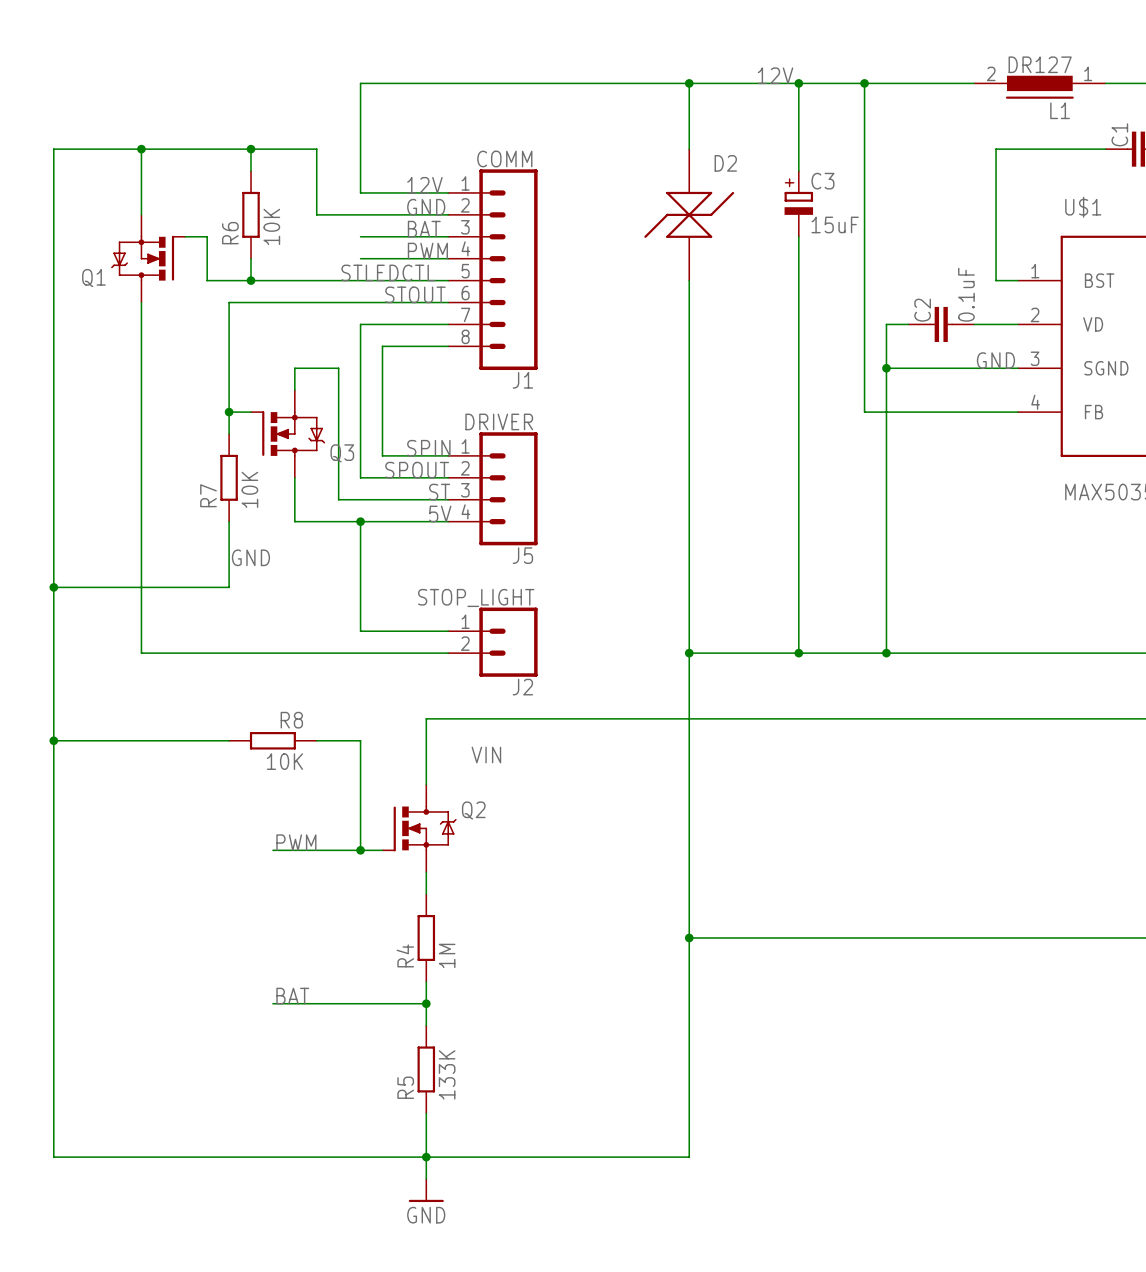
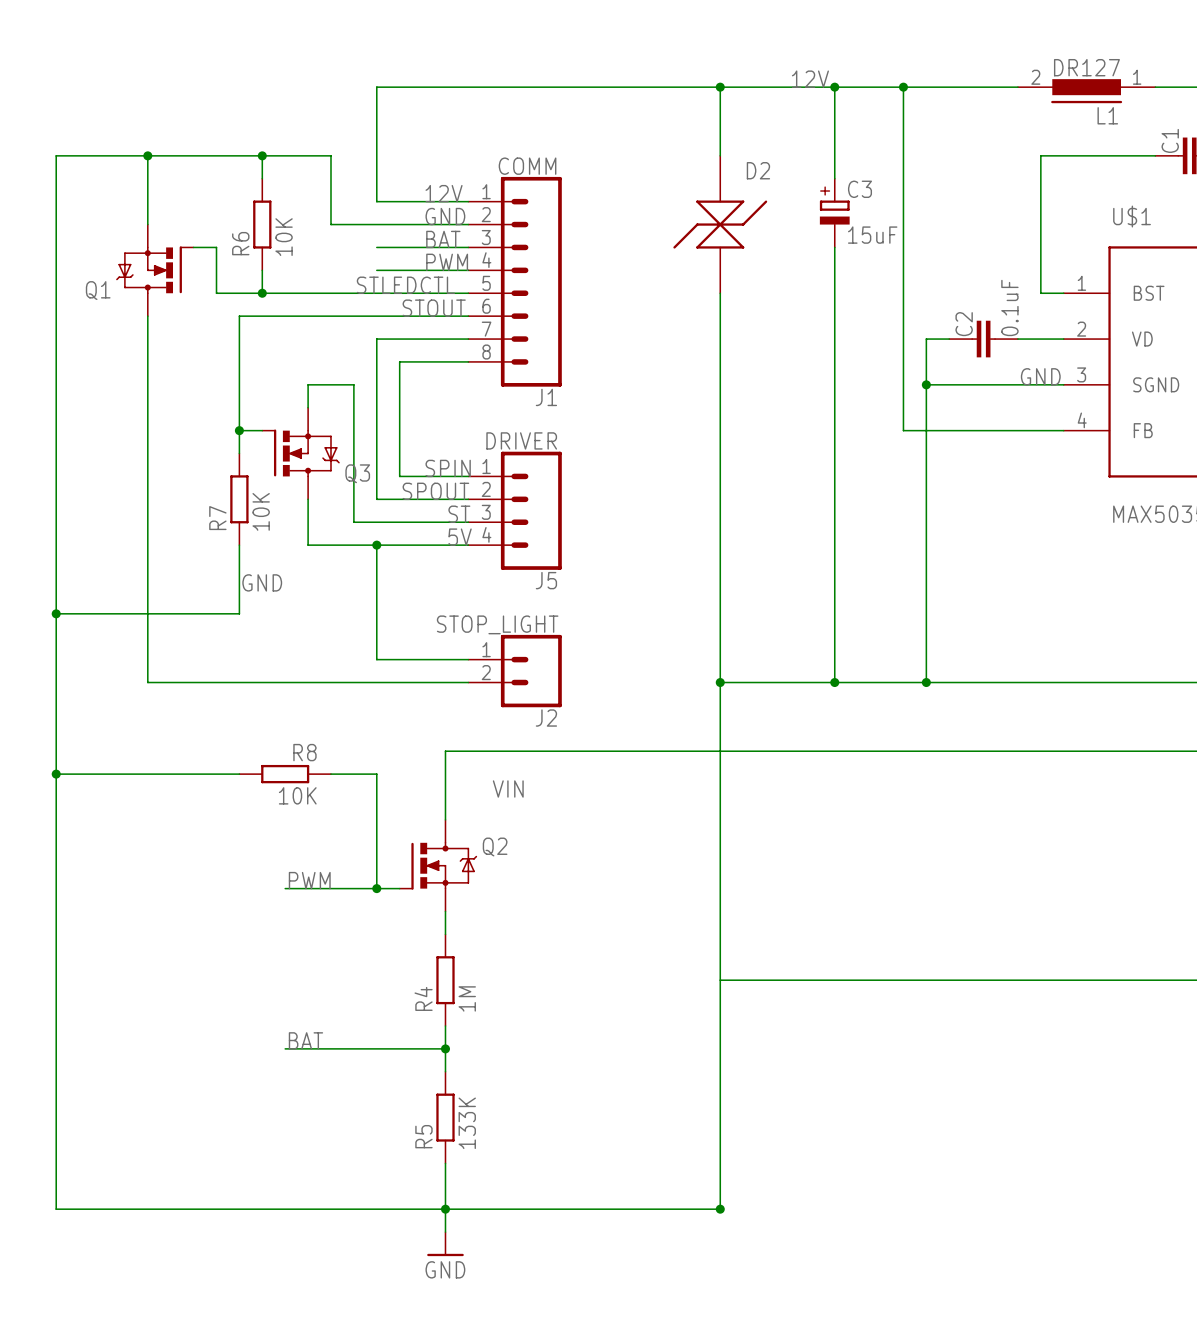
junction: (689, 937) -> none
junction: none -> (720, 1209)

